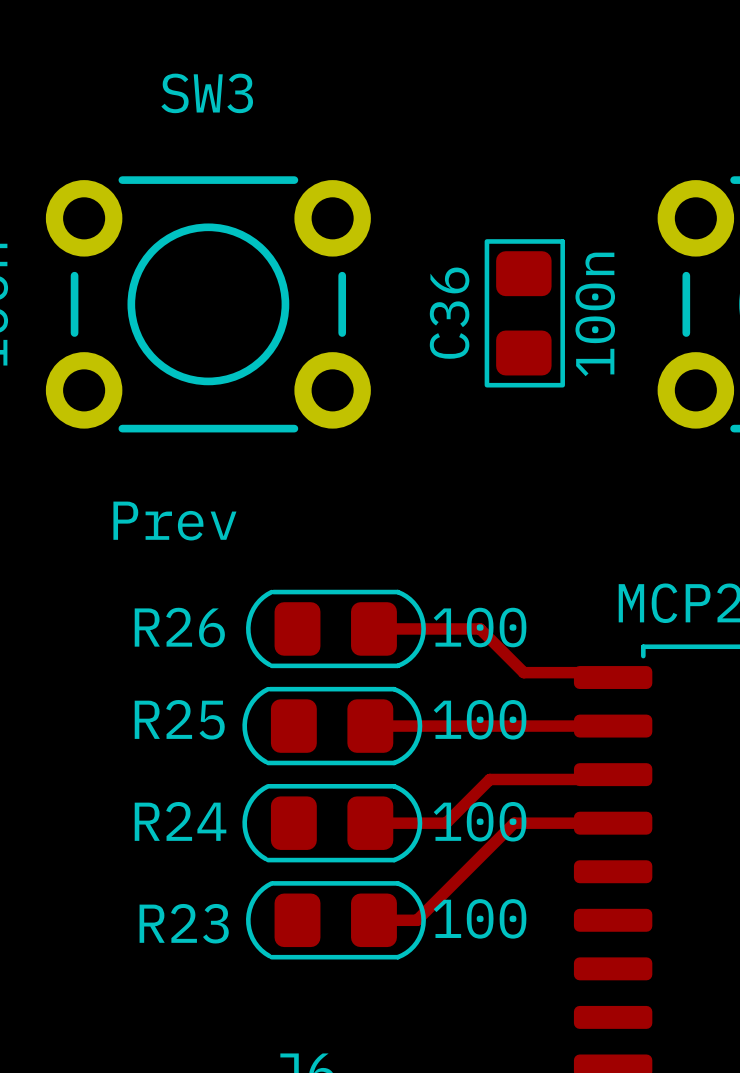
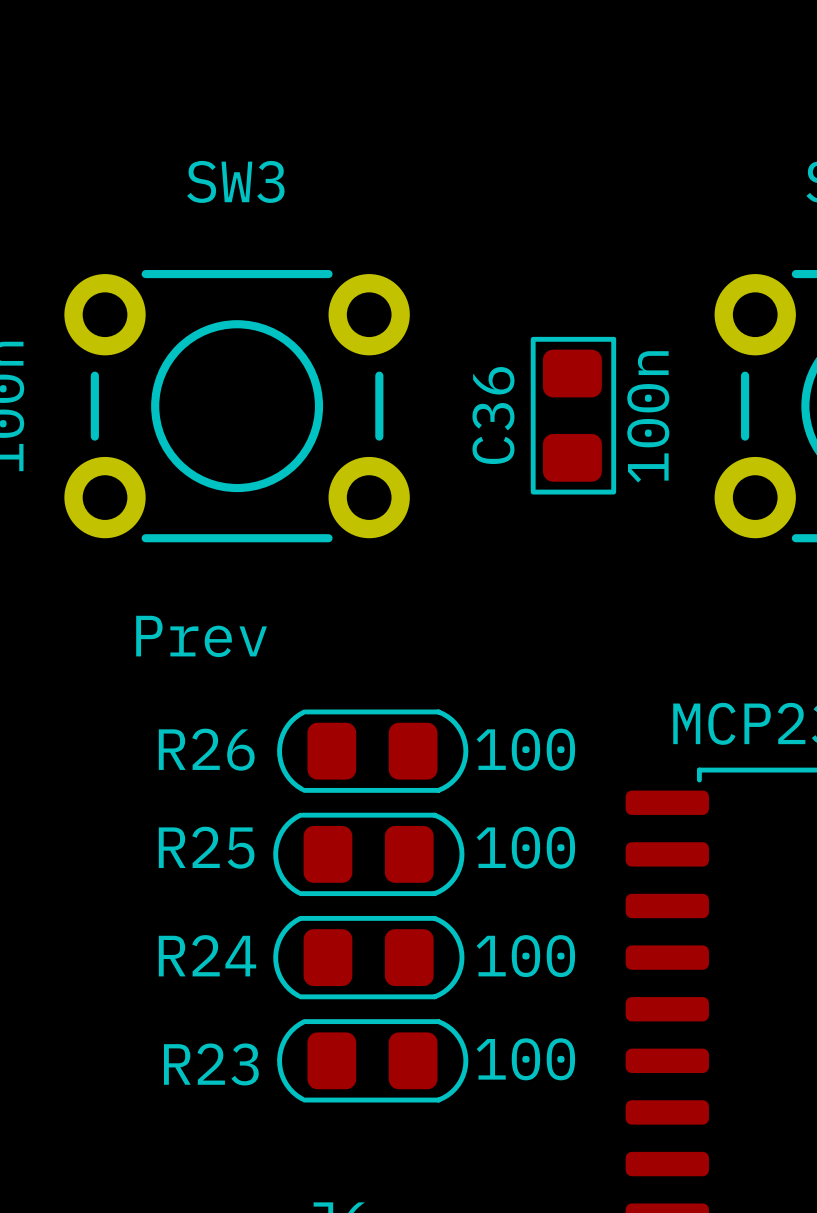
track: (373, 628) (480, 628) (523, 672) (608, 672) (613, 677) -> none
track: (370, 726) (613, 726) -> none
track: (613, 774) (608, 779) (489, 779) (446, 823) (370, 823) -> none
track: (613, 823) (514, 823) (417, 920) (373, 920) -> none

